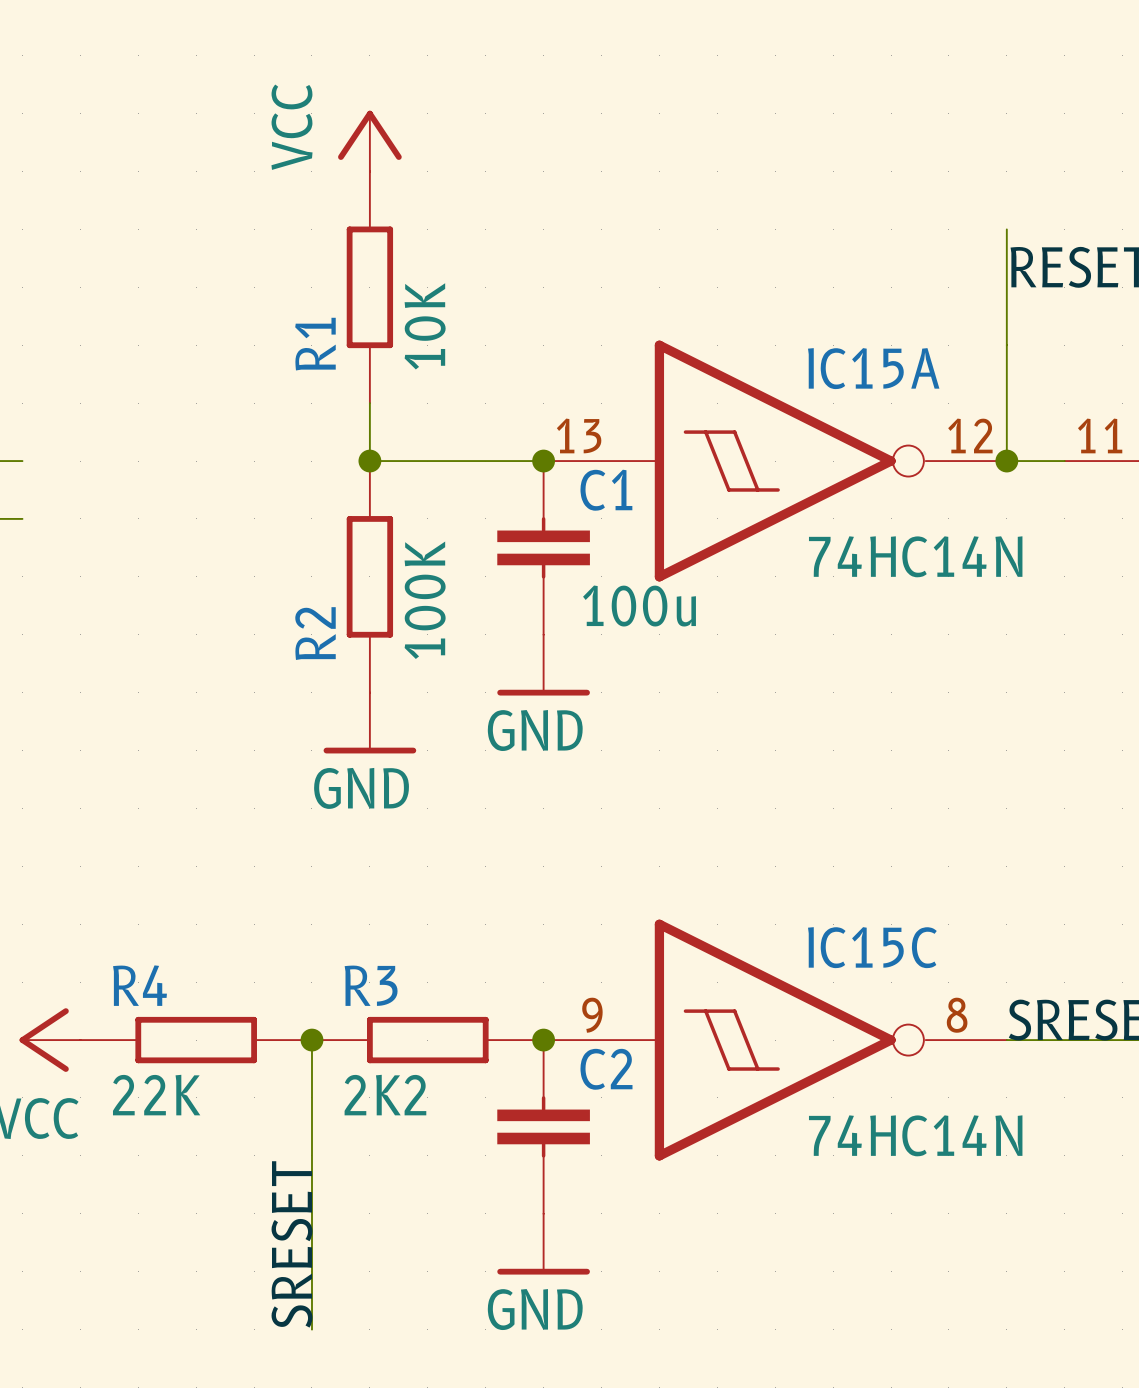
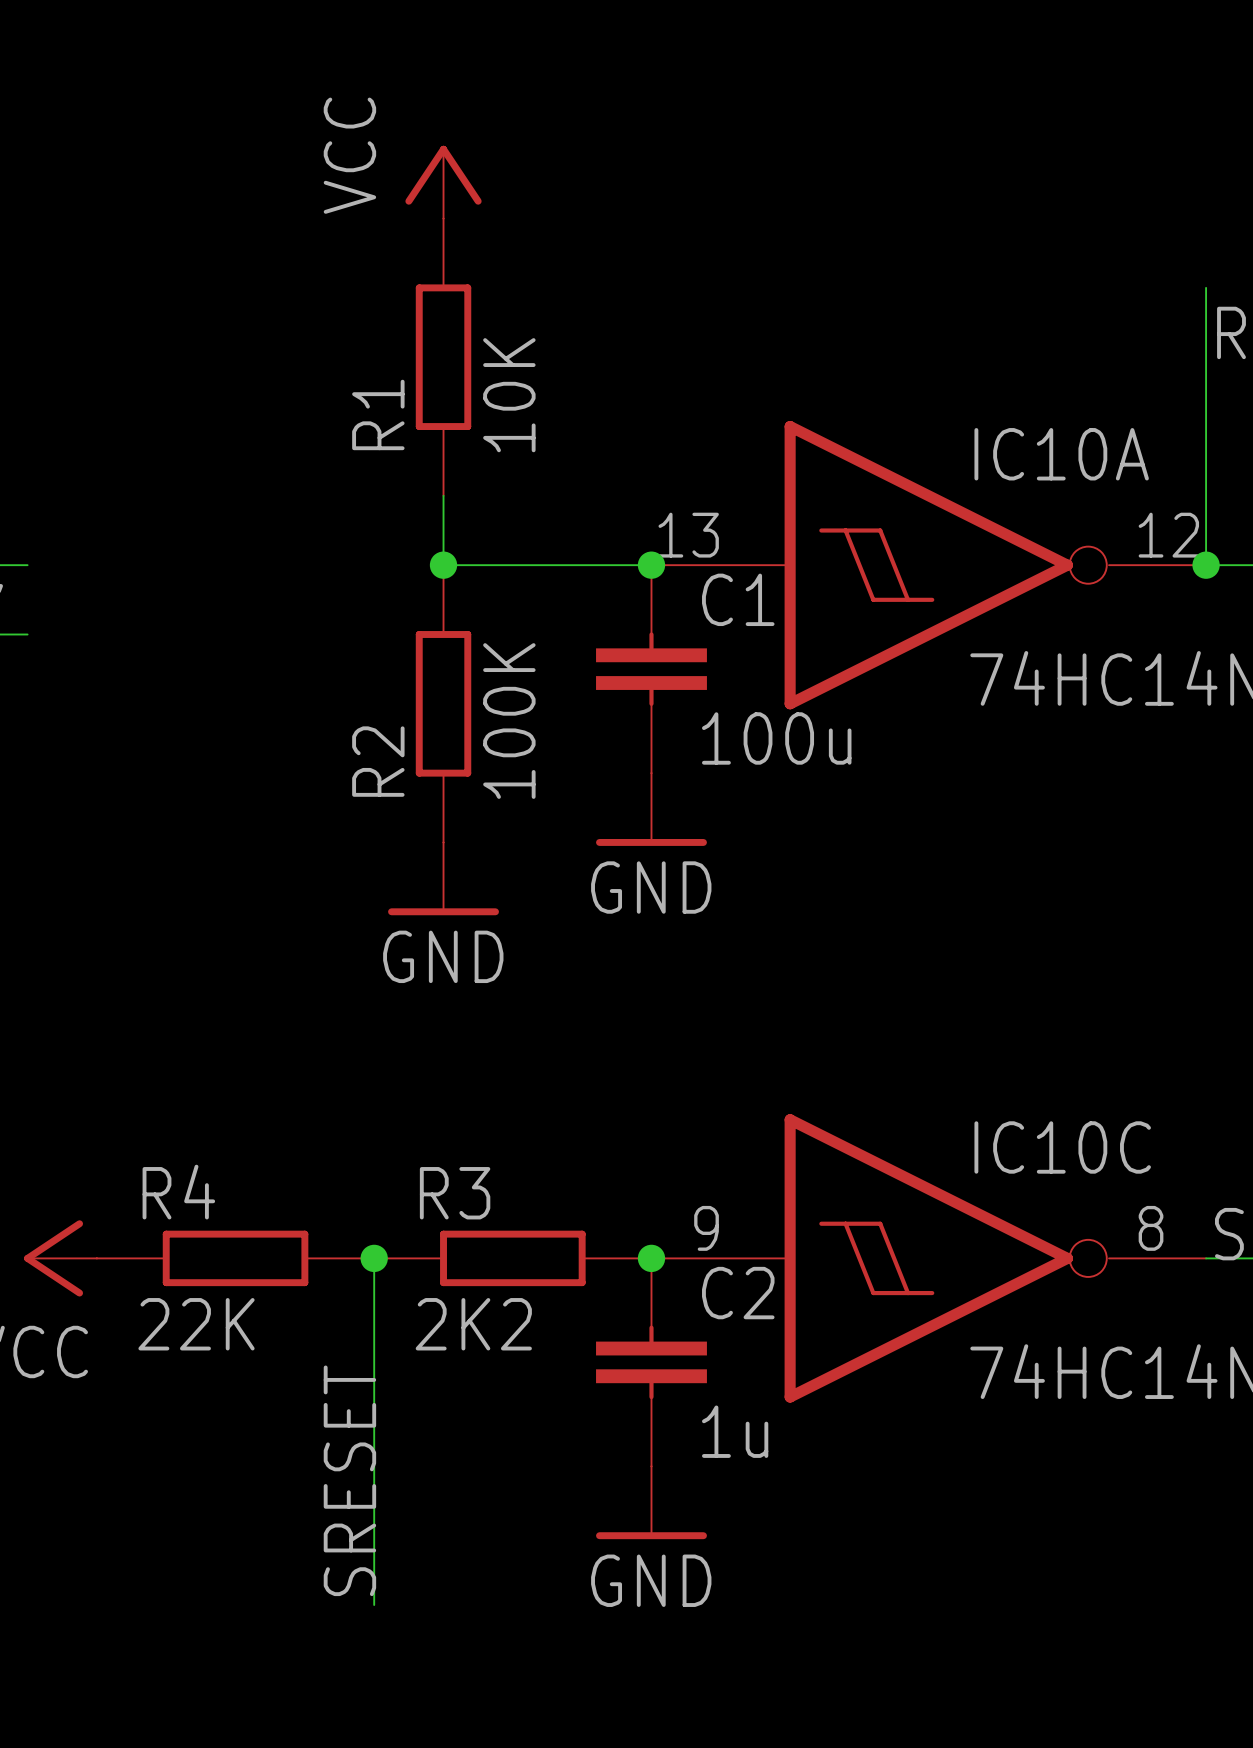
IC15A name: IC15A (873, 368) -> IC10A (1061, 454)
IC15C name: IC15C (872, 947) -> IC10C (1062, 1147)
C2 value: none -> 1u (735, 1431)

